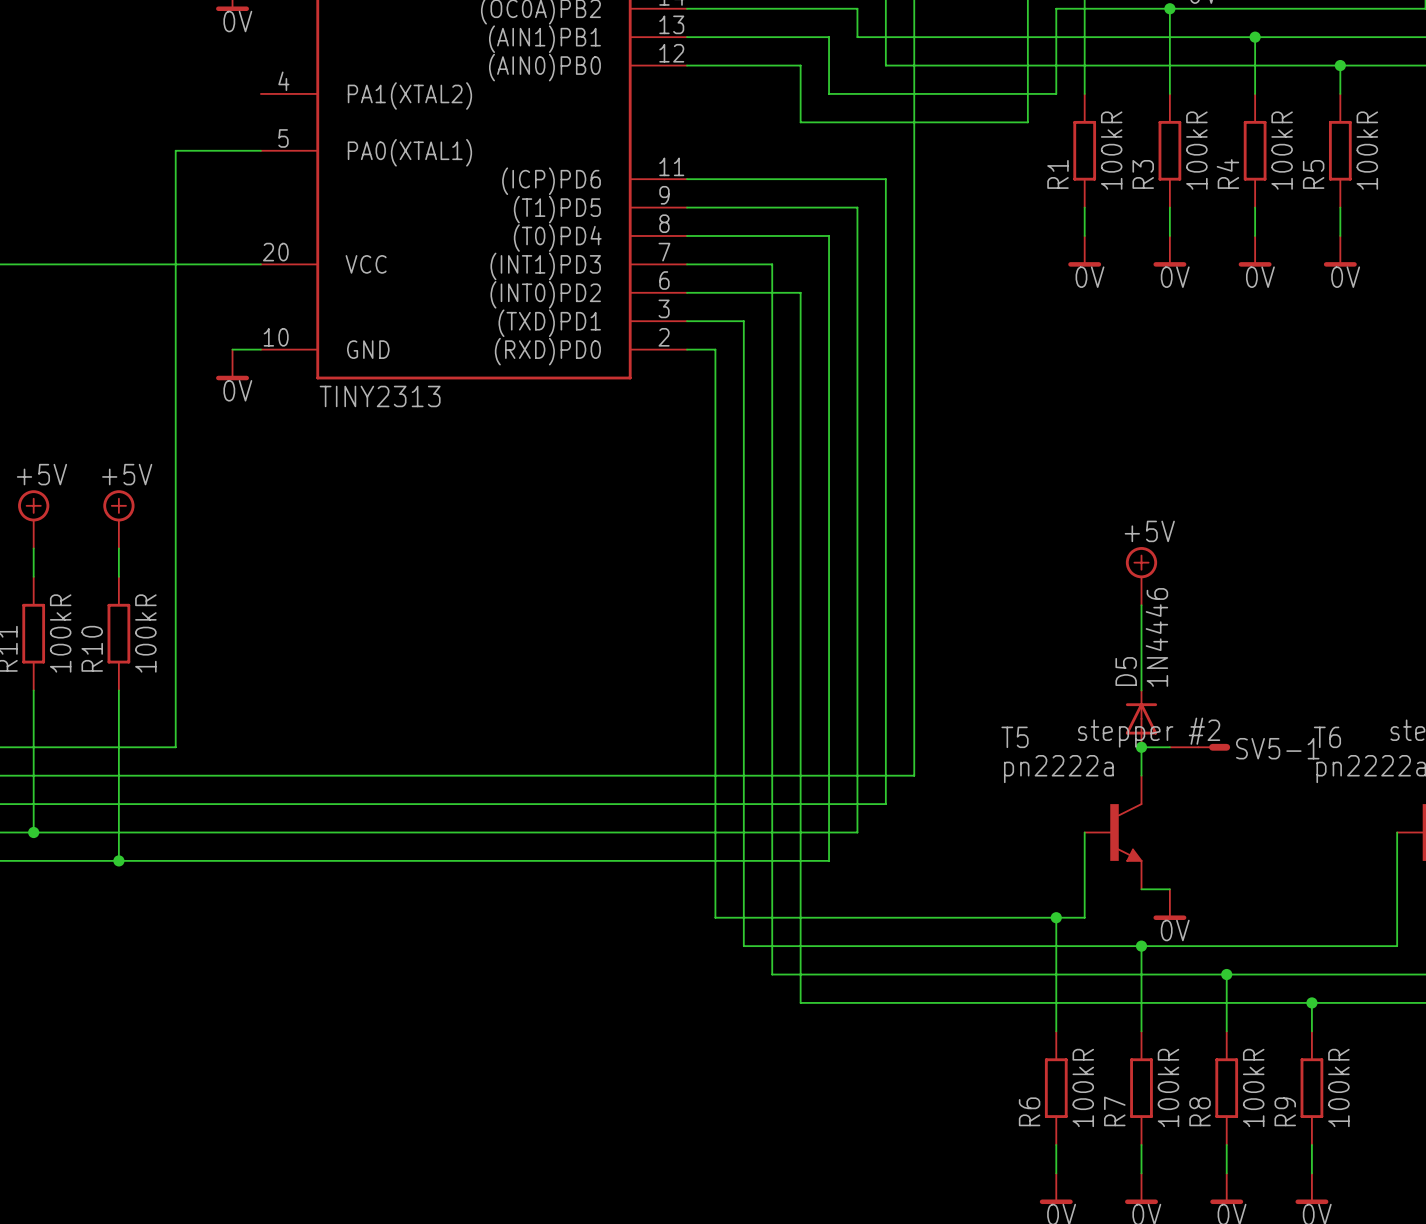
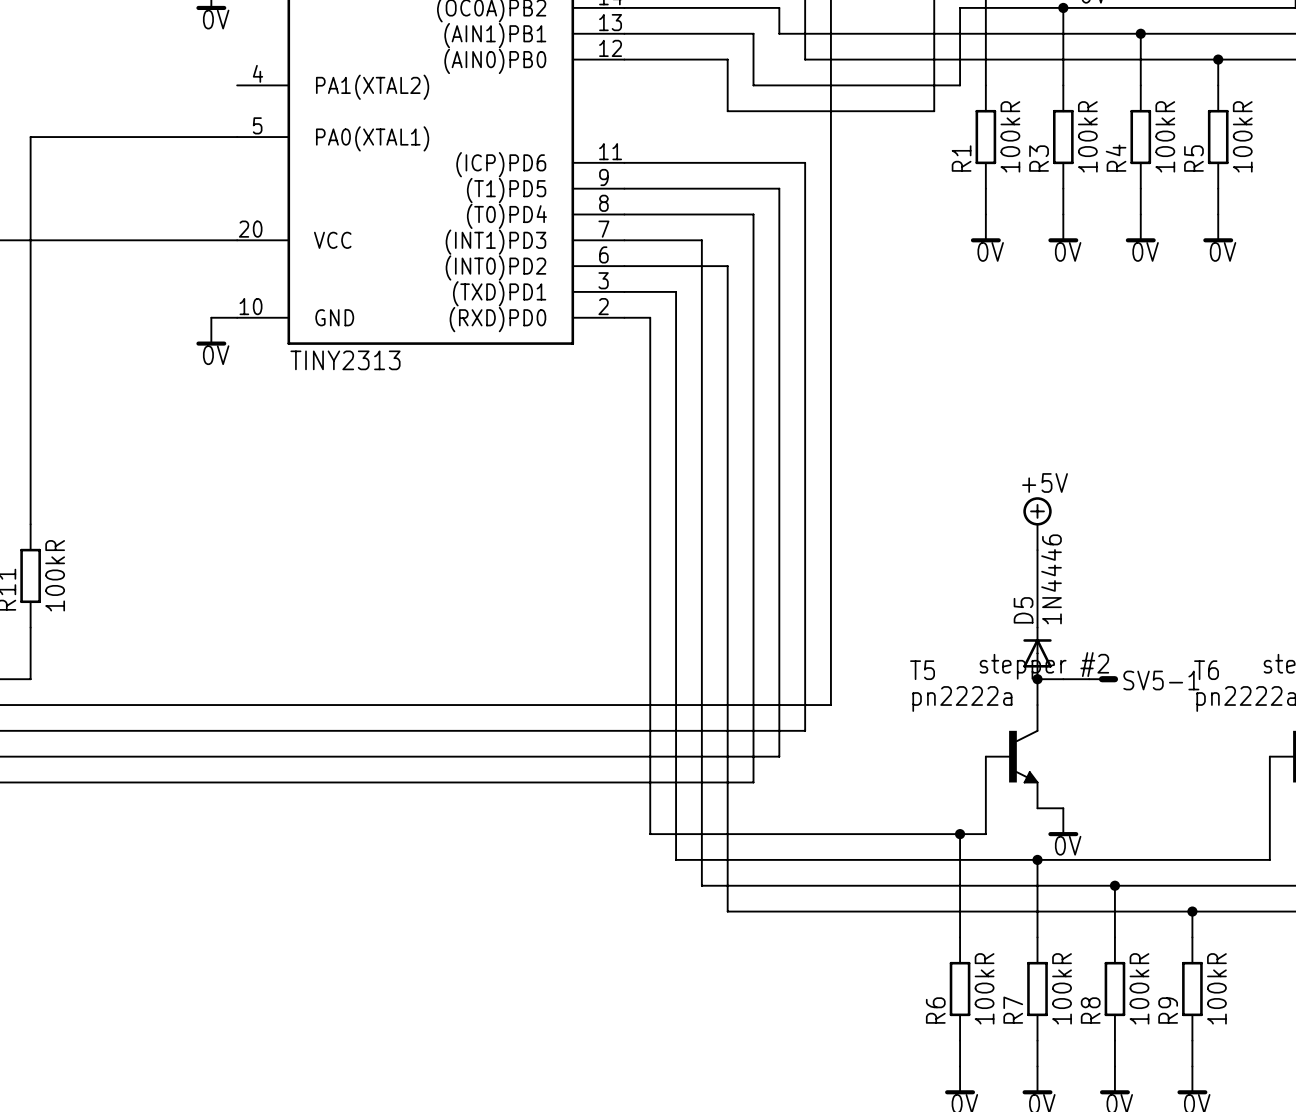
wire: (175, 150) (175, 747) (33, 747) (33, 832) -> (159, 137) (30, 137) (30, 498)
power symbol: +5V (33, 519) -> none
power symbol: +5V (118, 519) -> none
wire: (118, 548) (118, 576) -> none
R10: 100kR (118, 633) -> none
wire: (118, 690) (118, 860) -> none
junction: (33, 832) -> none
junction: (118, 860) -> none

